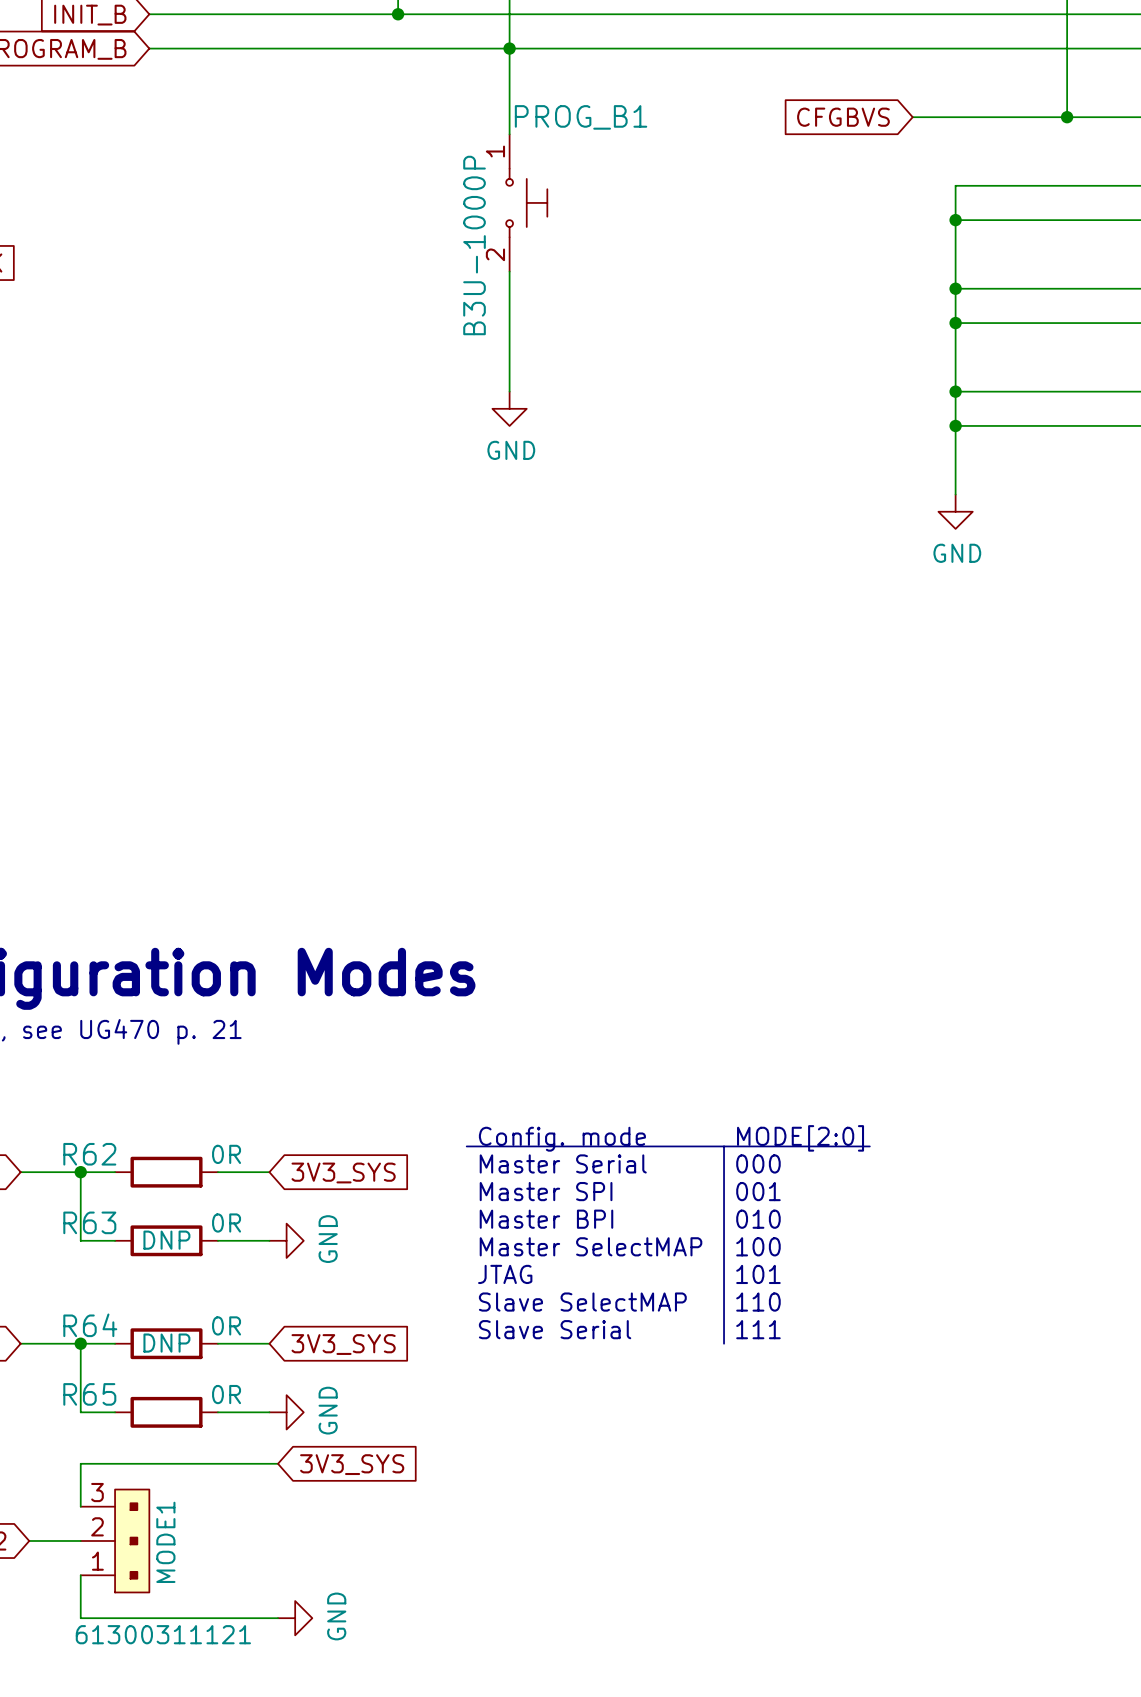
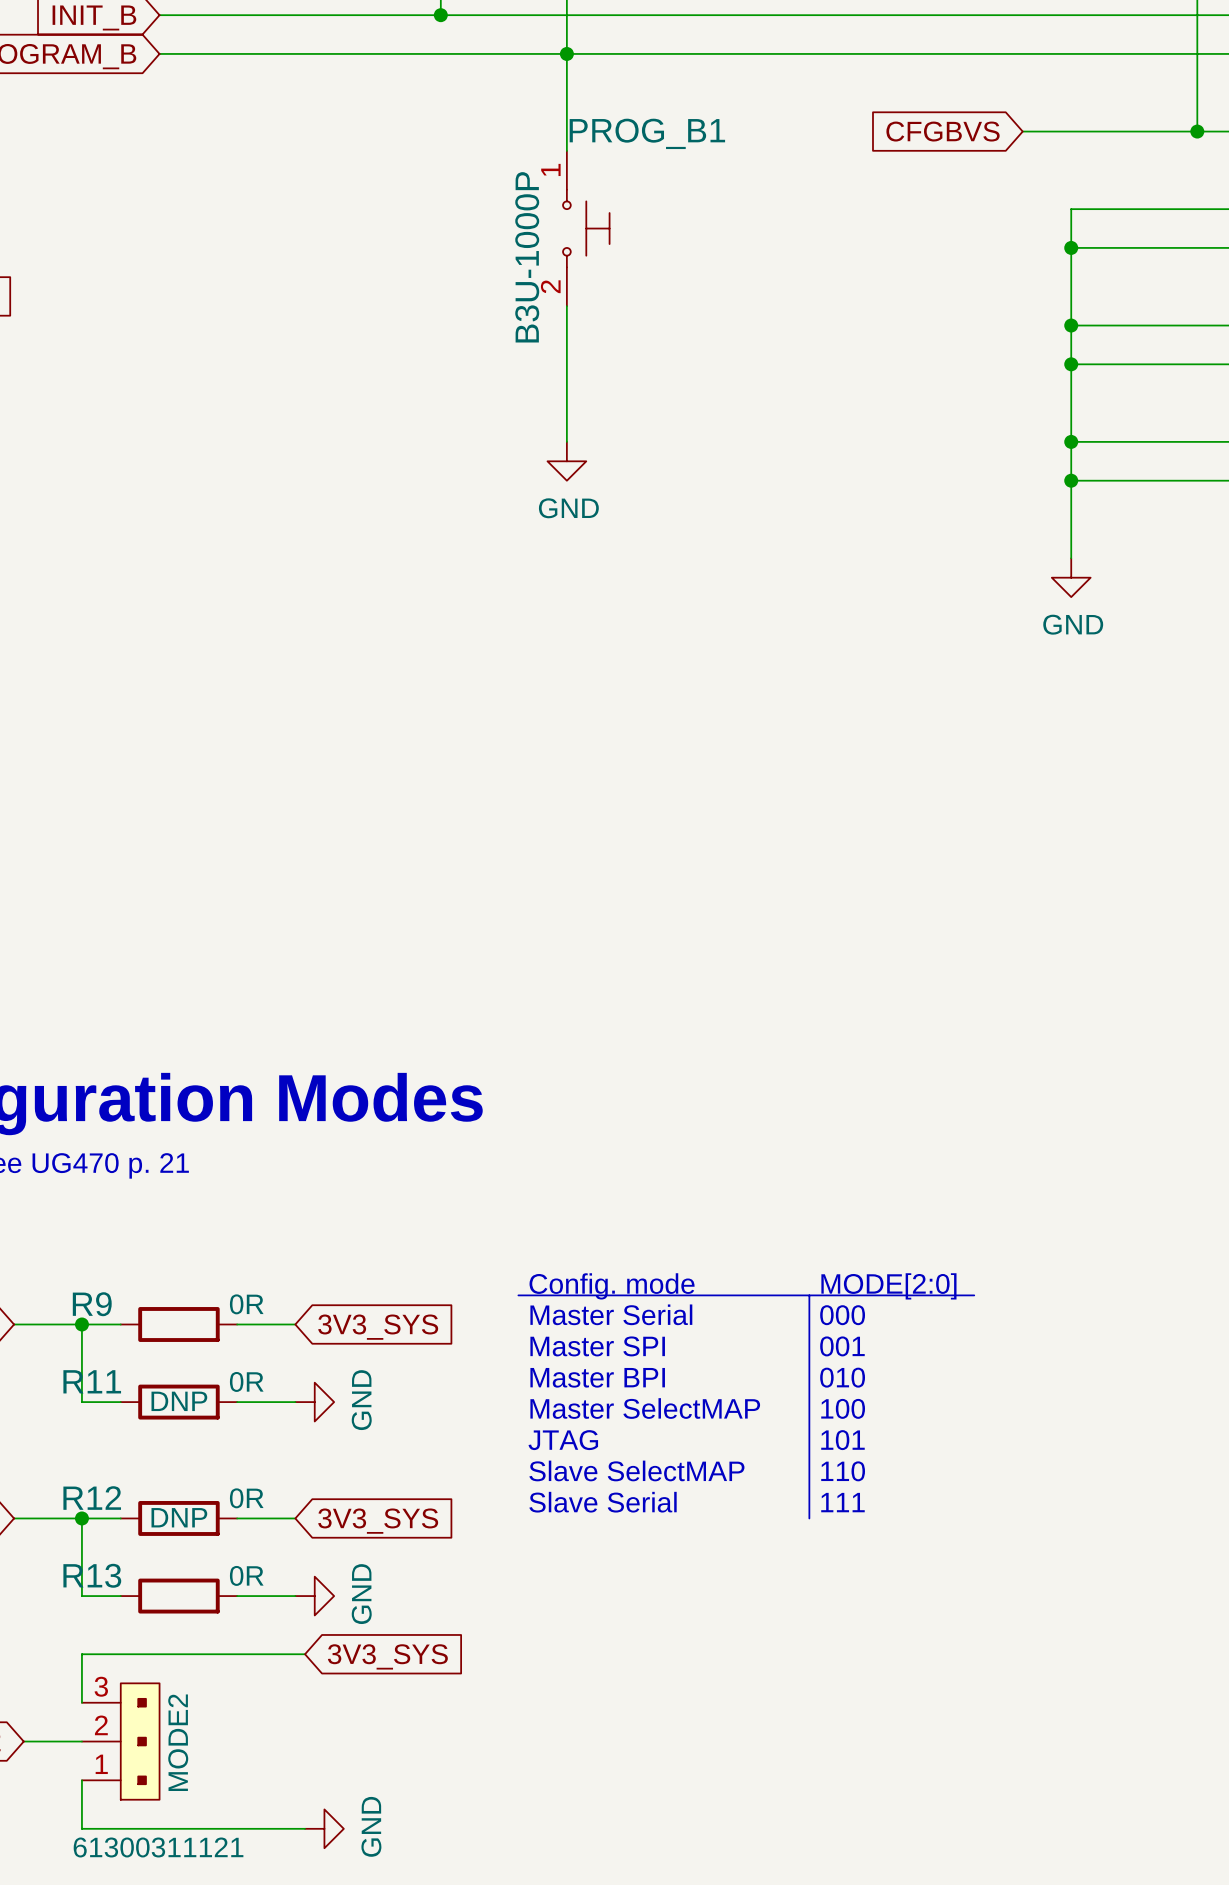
R62 name: R62 (89, 1154) -> R9 (92, 1304)
R63 name: R63 (89, 1222) -> R11 (92, 1381)
R64 name: R64 (90, 1325) -> R12 (92, 1498)
R65 name: R65 (89, 1394) -> R13 (92, 1575)
MODE1 name: MODE1 (165, 1542) -> MODE2 (178, 1742)

